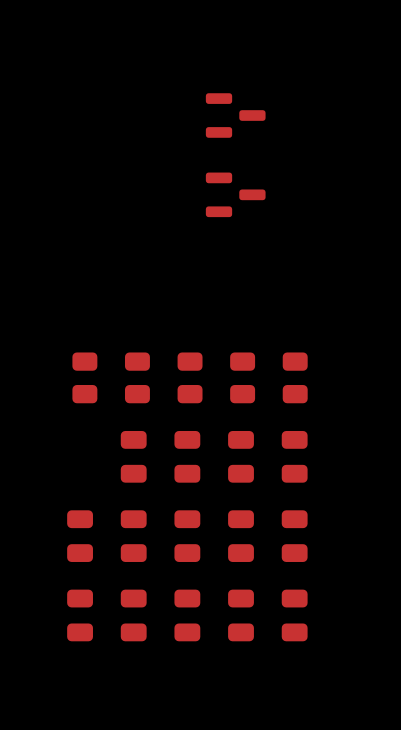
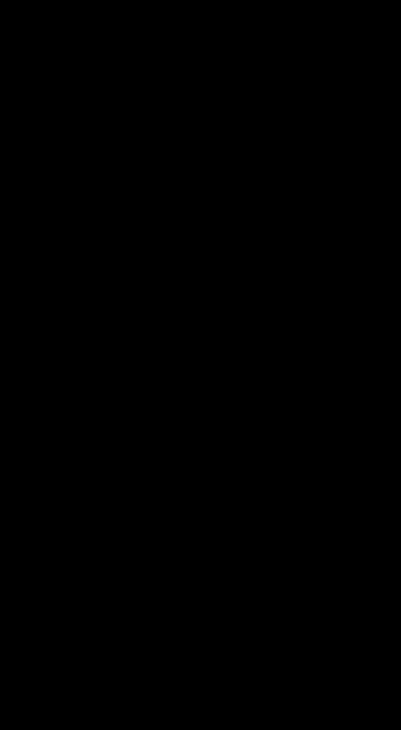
part: (235, 115) -> none
part: (235, 194) -> none
part: (84, 377) -> none
part: (137, 377) -> none
part: (190, 377) -> none
part: (242, 377) -> none
part: (295, 377) -> none
part: (133, 456) -> none
part: (187, 456) -> none
part: (241, 456) -> none
part: (294, 456) -> none
part: (80, 536) -> none
part: (133, 536) -> none
part: (187, 536) -> none
part: (241, 536) -> none
part: (294, 536) -> none
part: (80, 615) -> none
part: (133, 615) -> none
part: (187, 615) -> none
part: (241, 615) -> none
part: (294, 615) -> none

